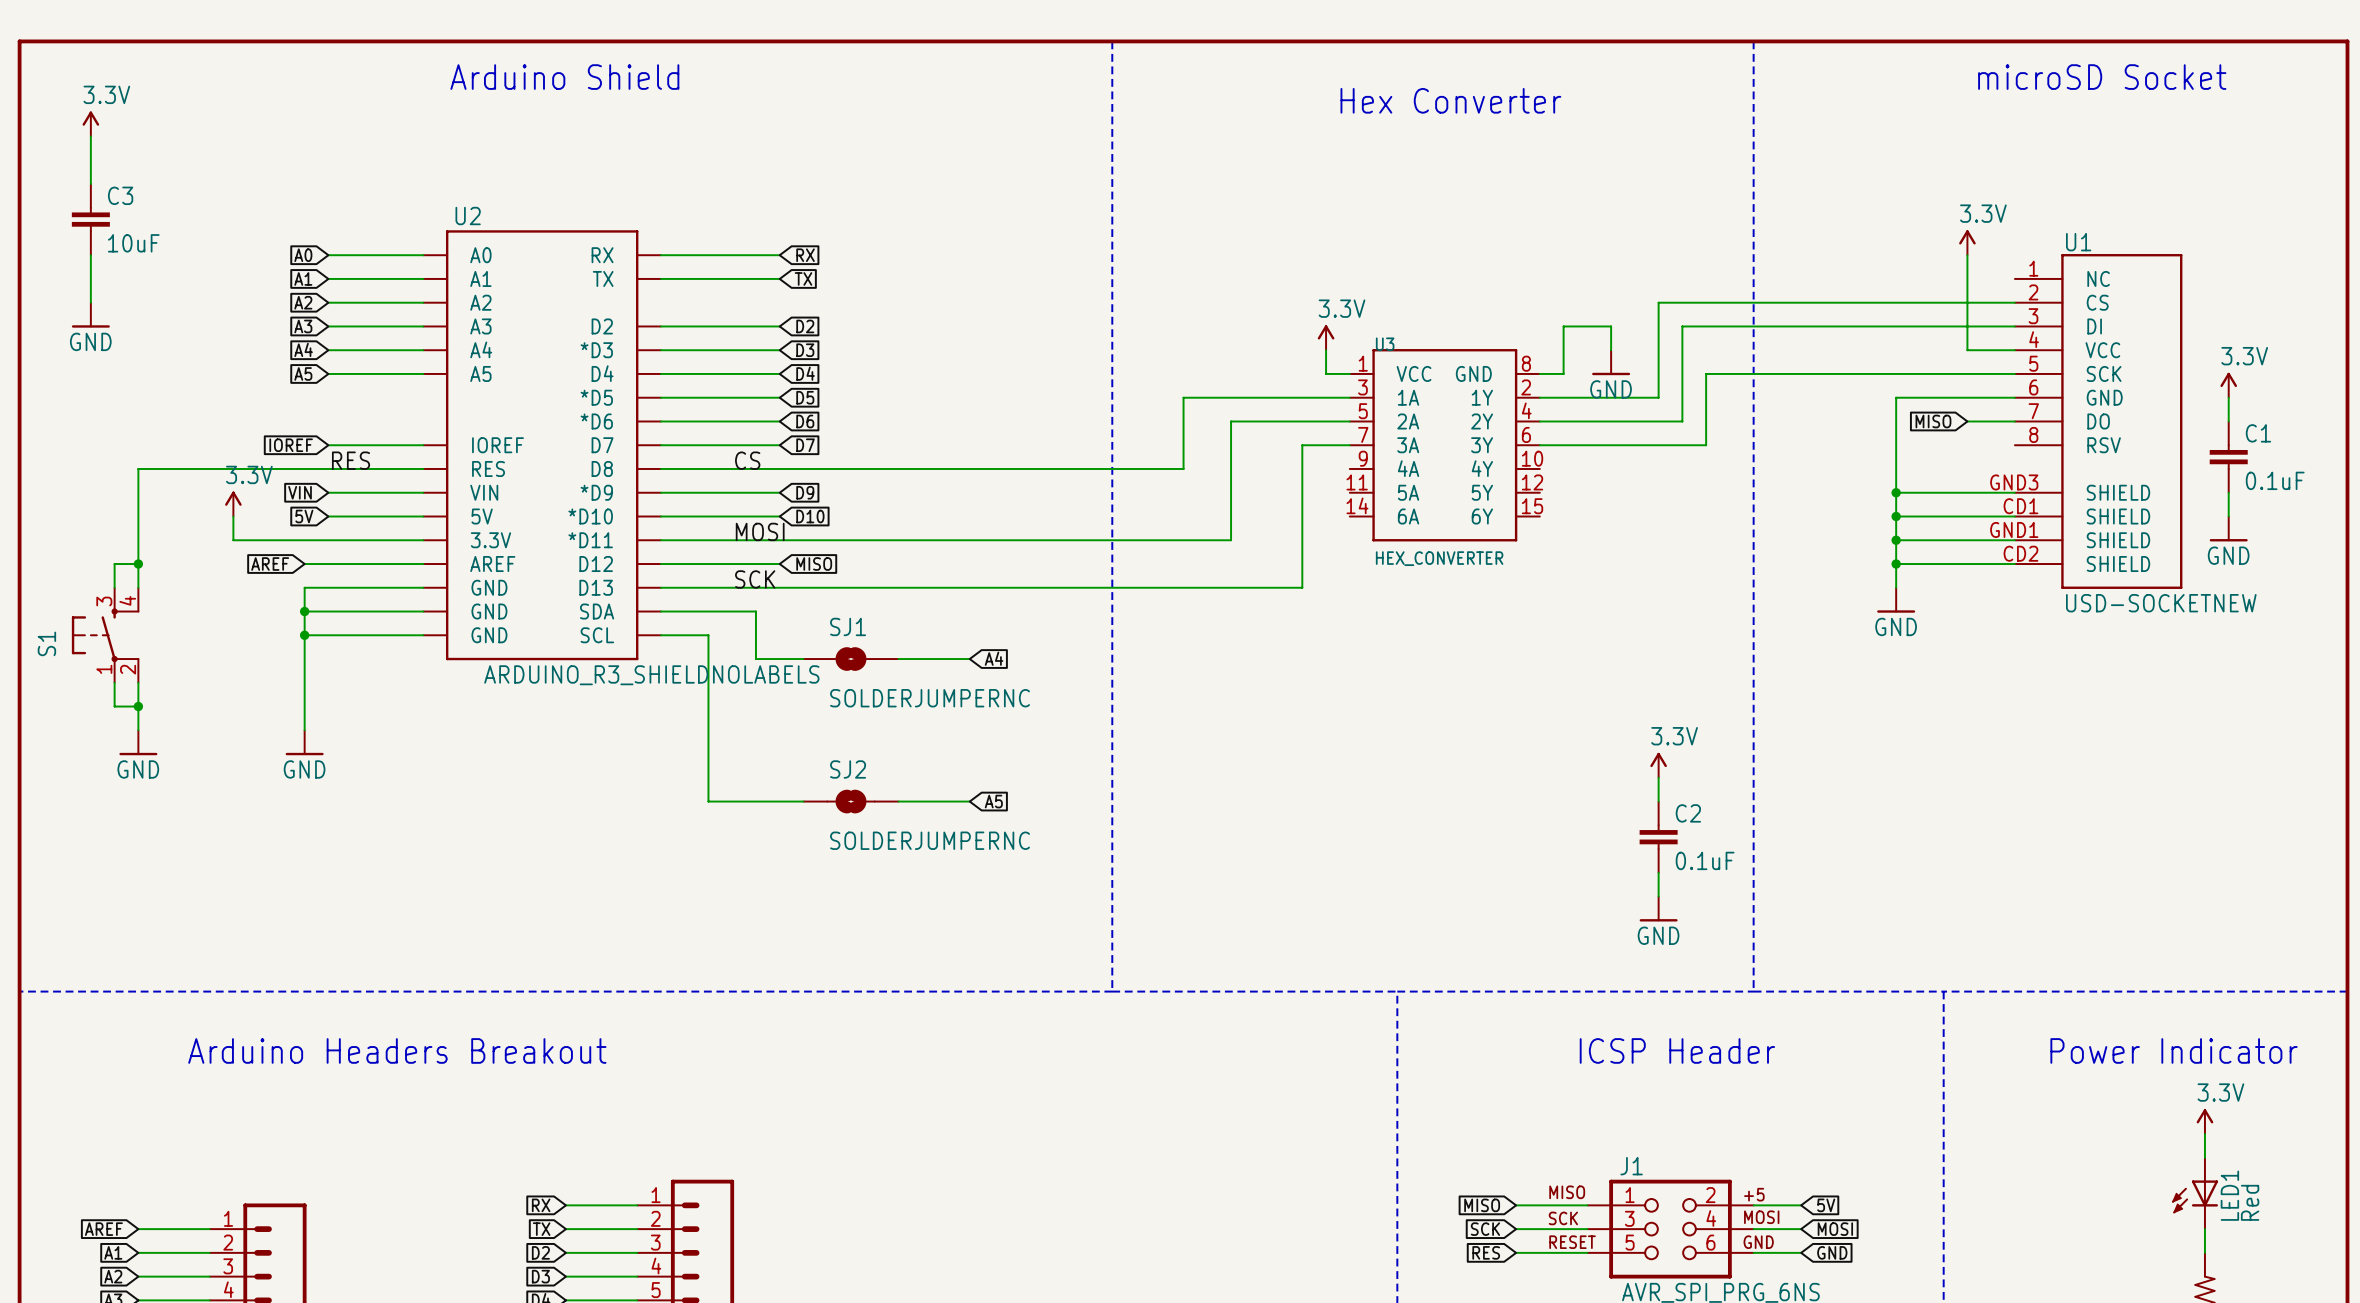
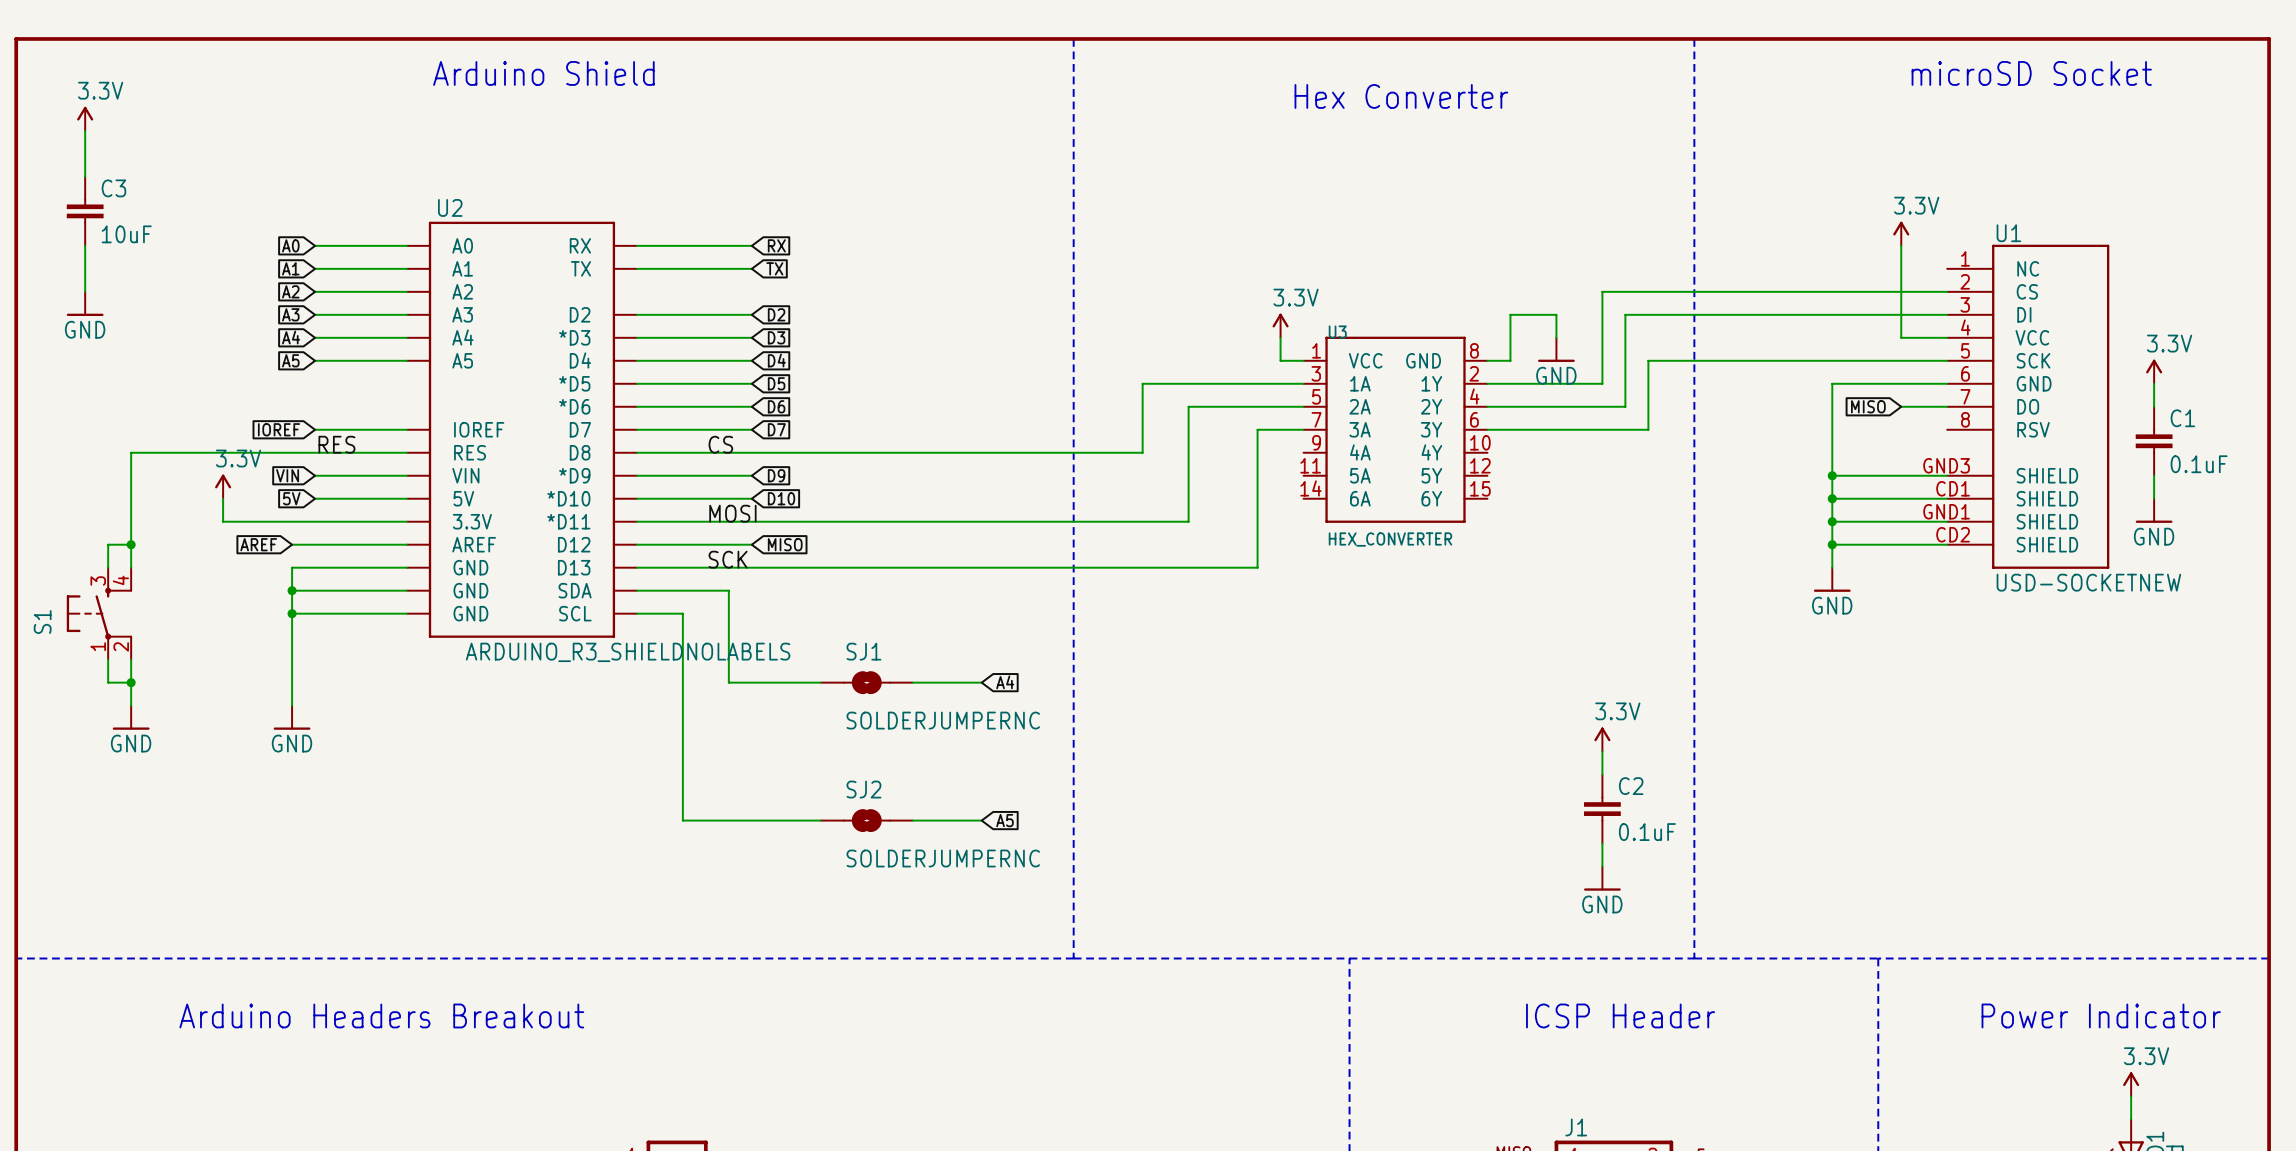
global label position: A4 (994, 658) -> A4 (1005, 682)
wire: (755, 659) (803, 659) -> (728, 636) (728, 682) (820, 682)
SJ1 position: (850, 659) -> (866, 682)
wire: (898, 659) (969, 659) -> (912, 682) (981, 682)
wire: (708, 801) (803, 801) -> (682, 774) (682, 820) (820, 820)
SJ2 position: (850, 801) -> (866, 820)
wire: (898, 801) (969, 801) -> (912, 820) (981, 820)
global label position: A5 (993, 801) -> A5 (1004, 820)

